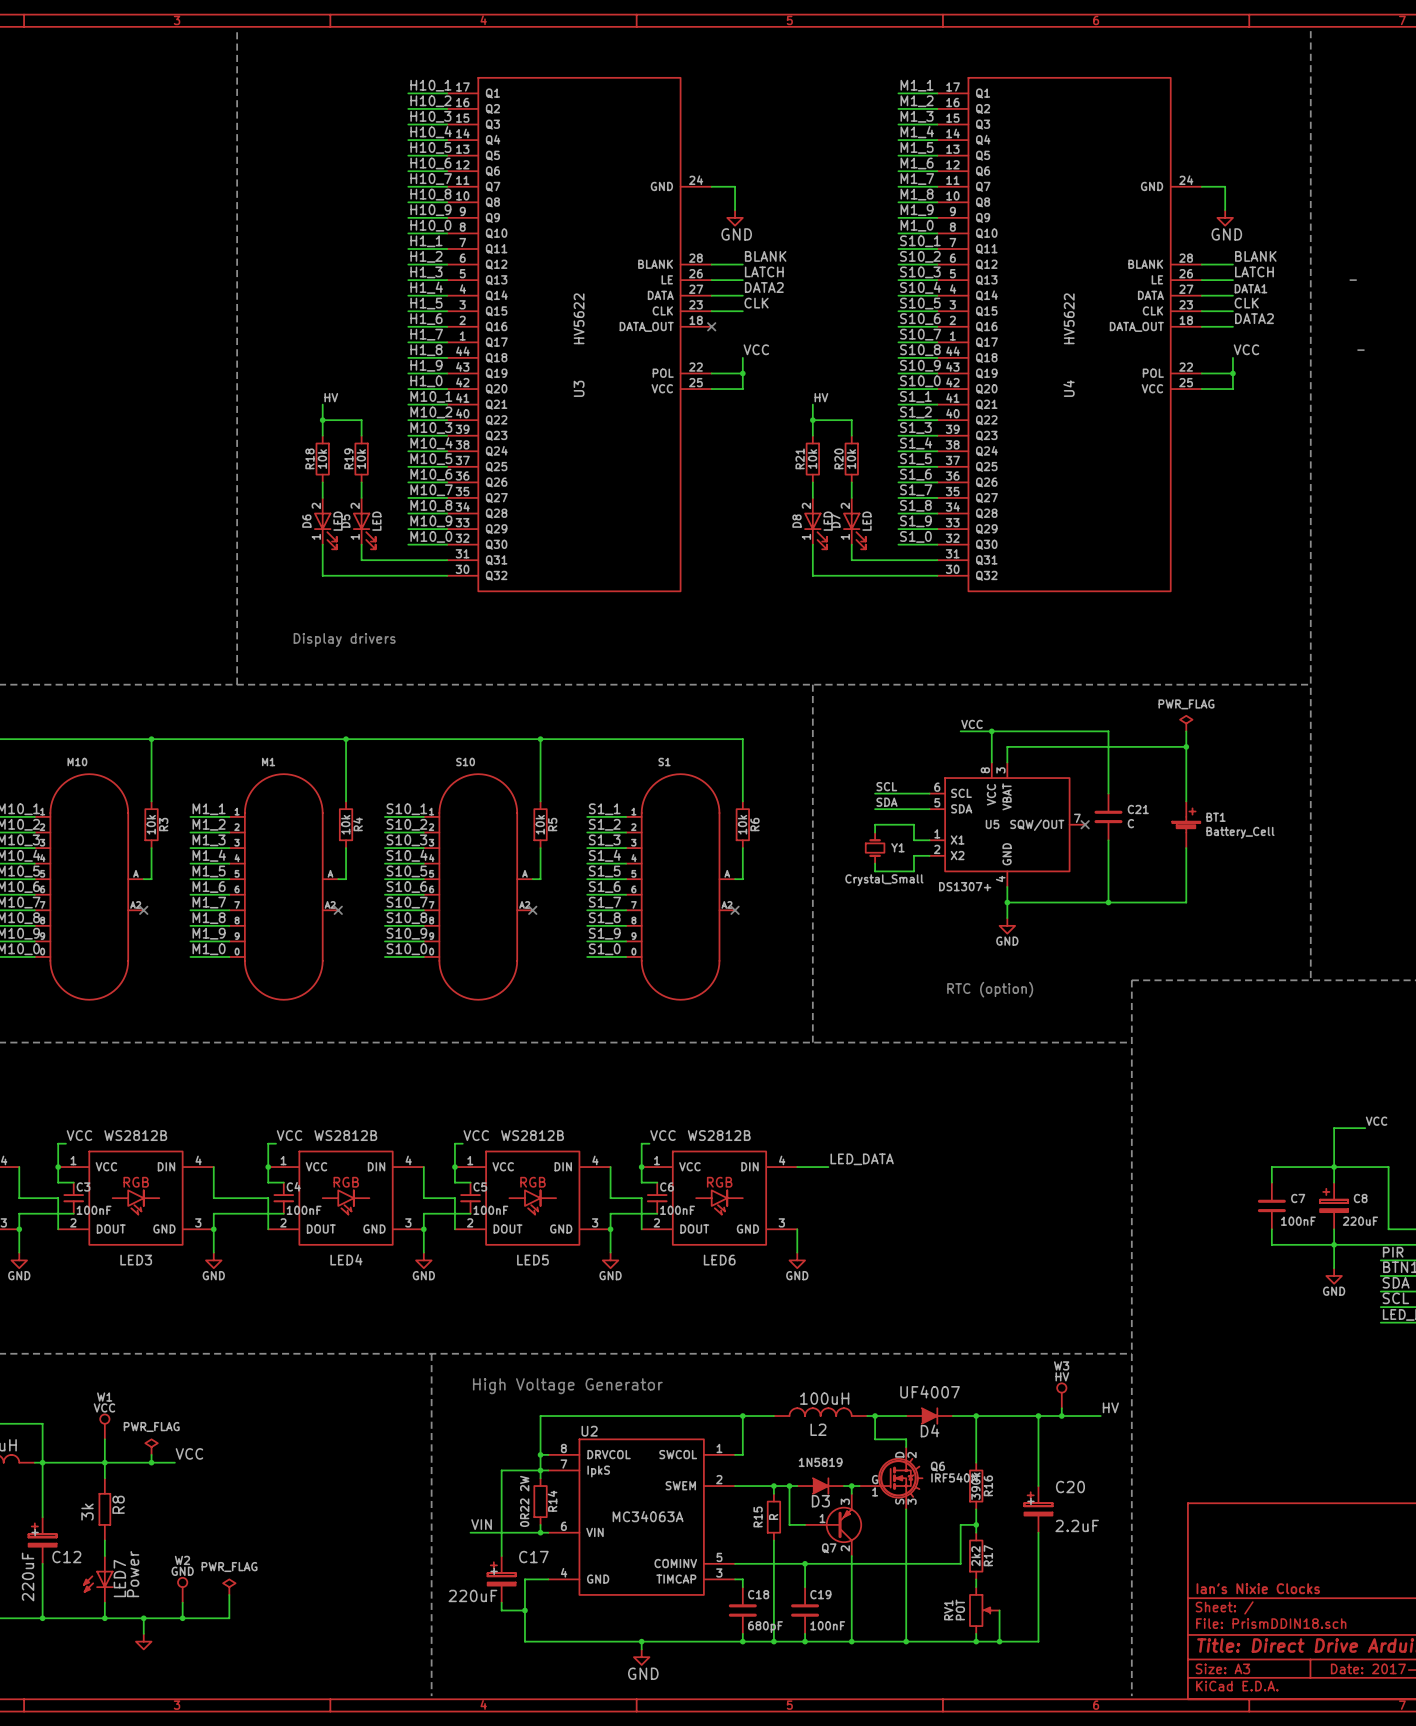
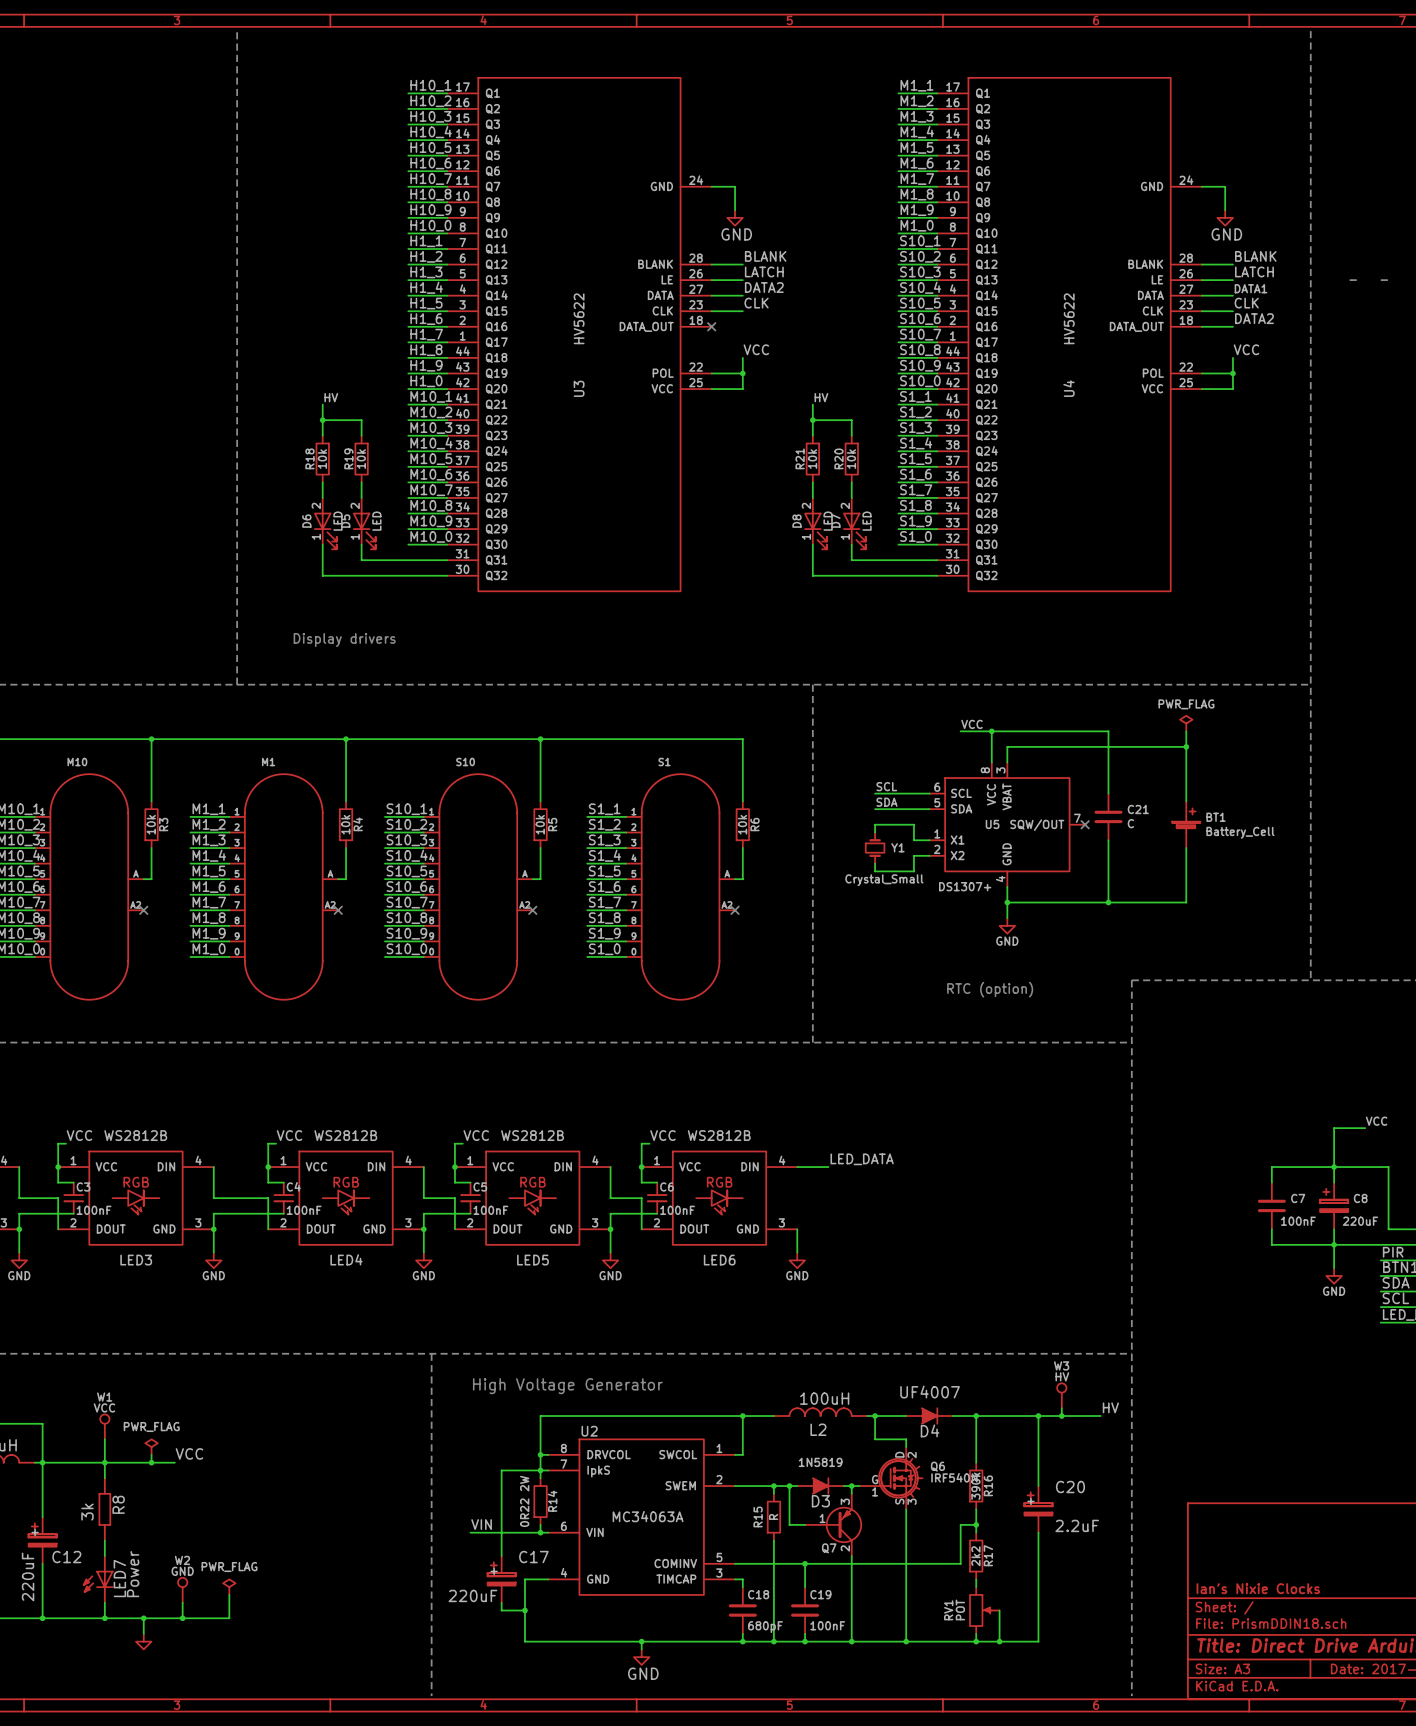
line: (1357, 350) (1365, 350) -> (1380, 280) (1388, 280)

